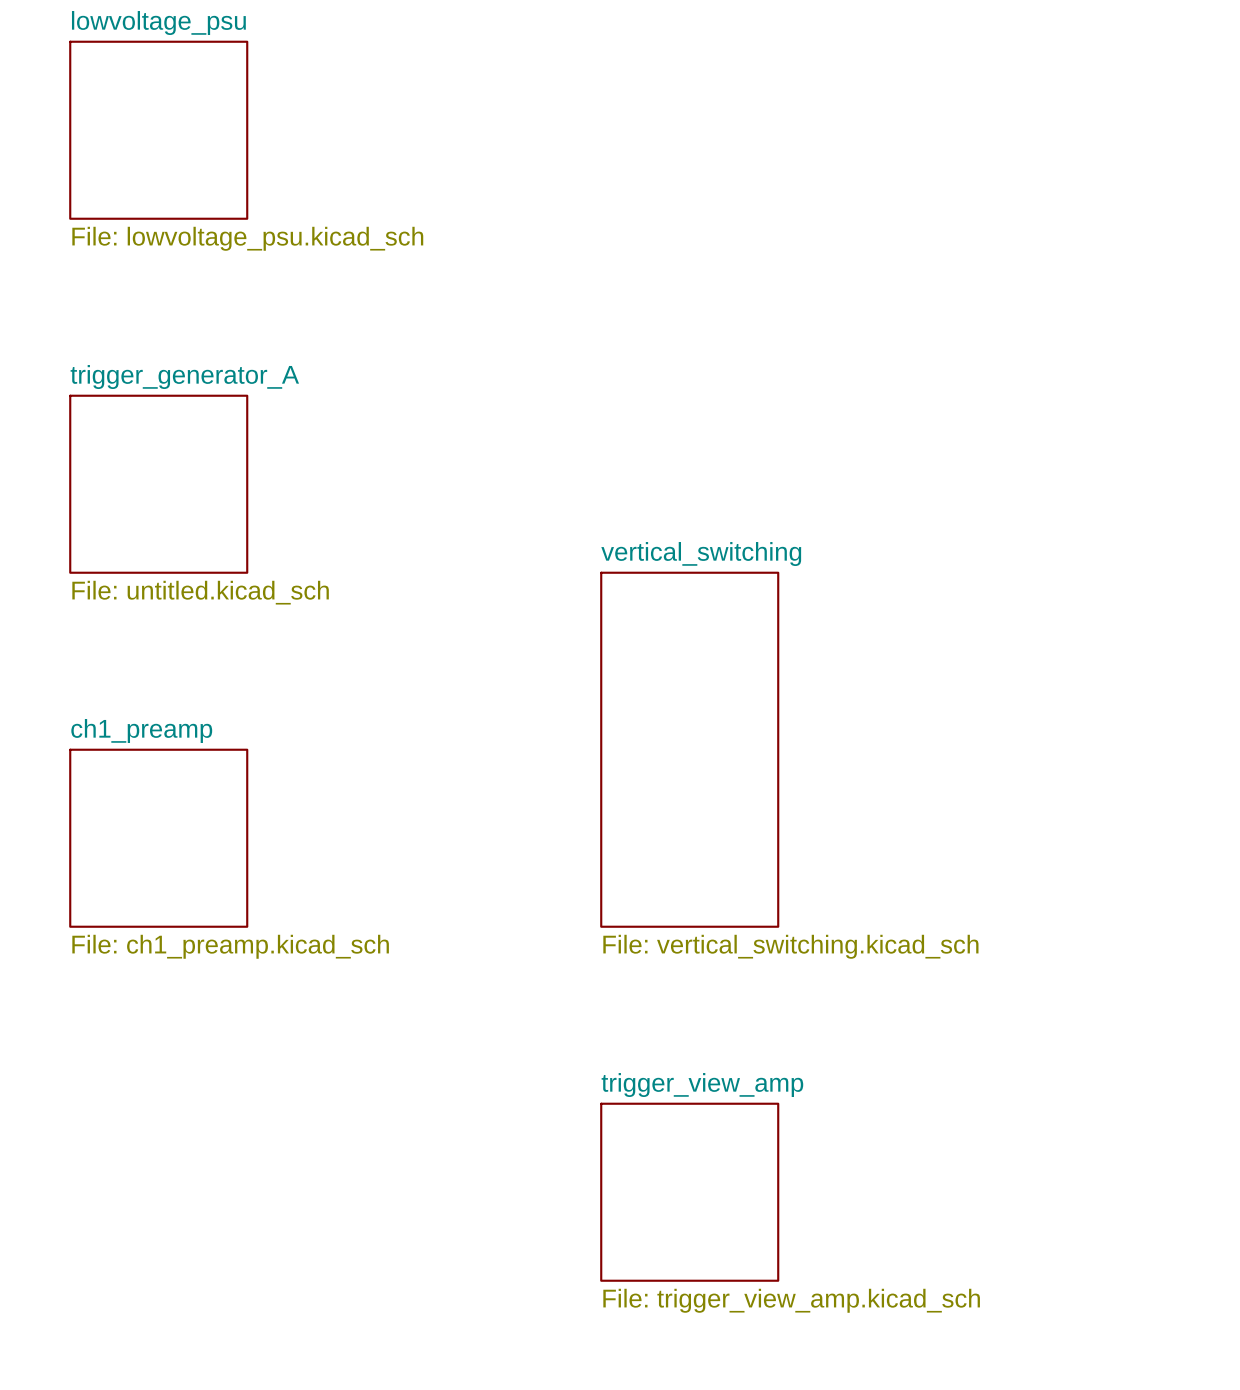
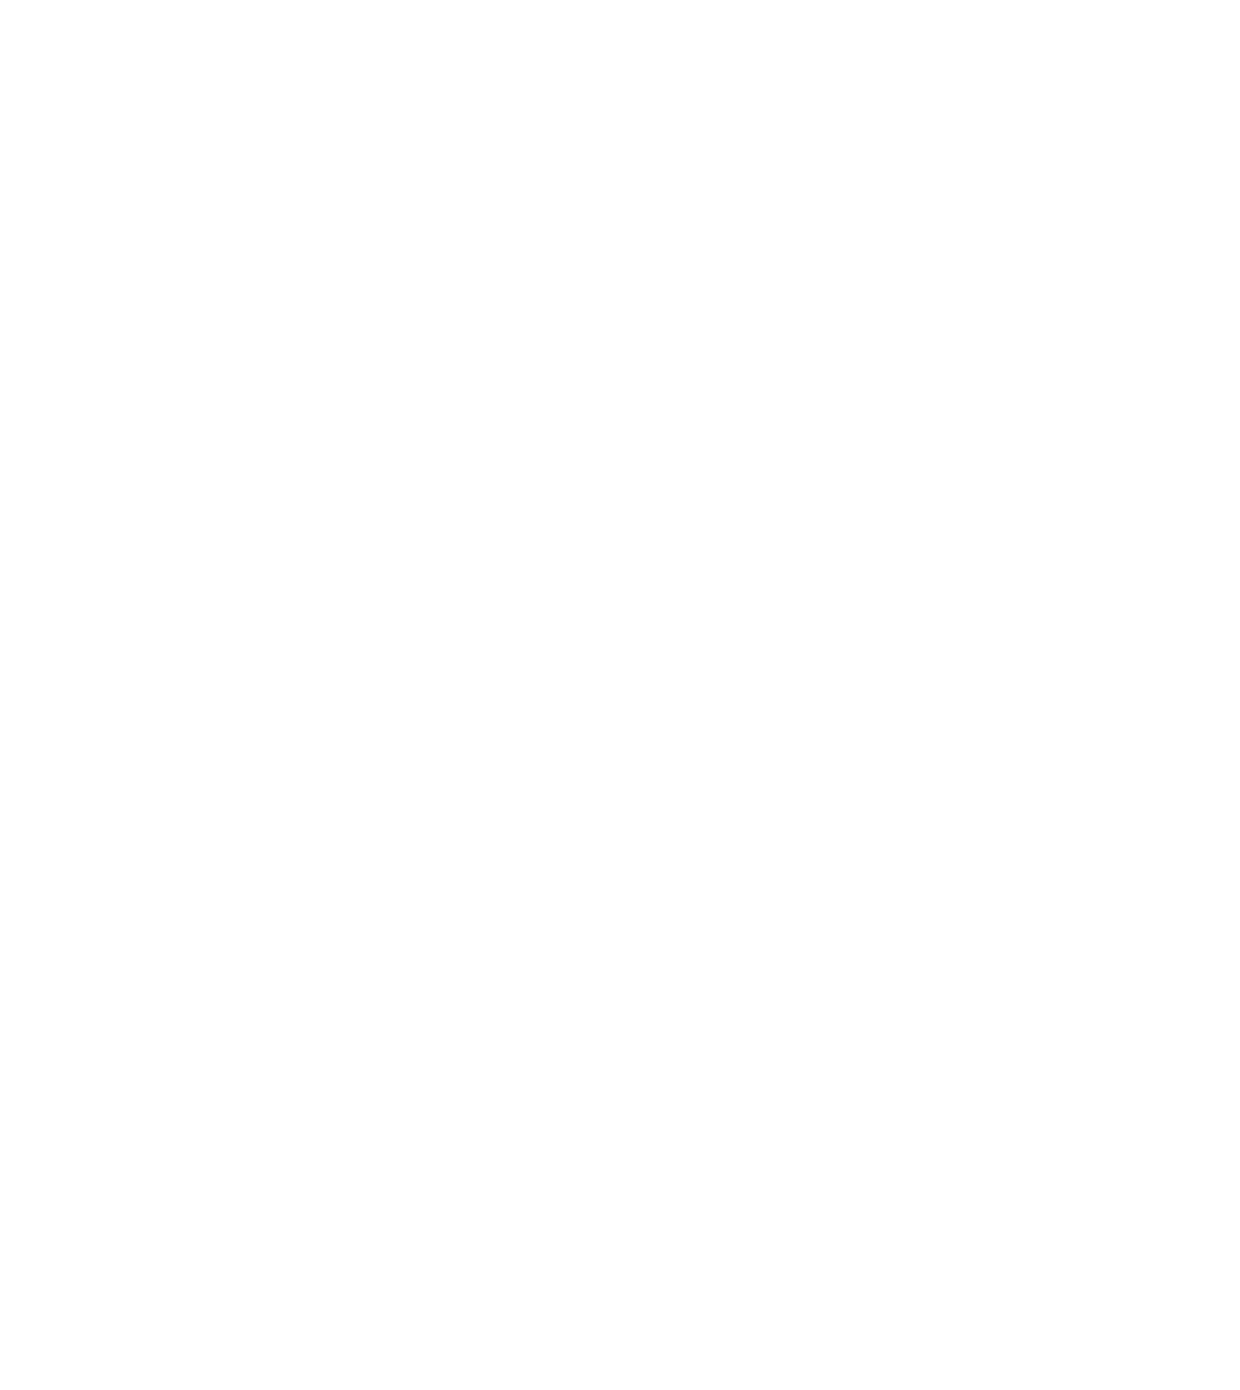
sheet lowvoltage_psu: File: lowvoltage_psu.kicad_sch (158, 130) -> none
sheet trigger_generator_A: File: untitled.kicad_sch (158, 484) -> none
sheet vertical_switching: File: vertical_switching.kicad_sch (689, 749) -> none
sheet ch1_preamp: File: ch1_preamp.kicad_sch (158, 838) -> none
sheet trigger_view_amp: File: trigger_view_amp.kicad_sch (689, 1192) -> none

